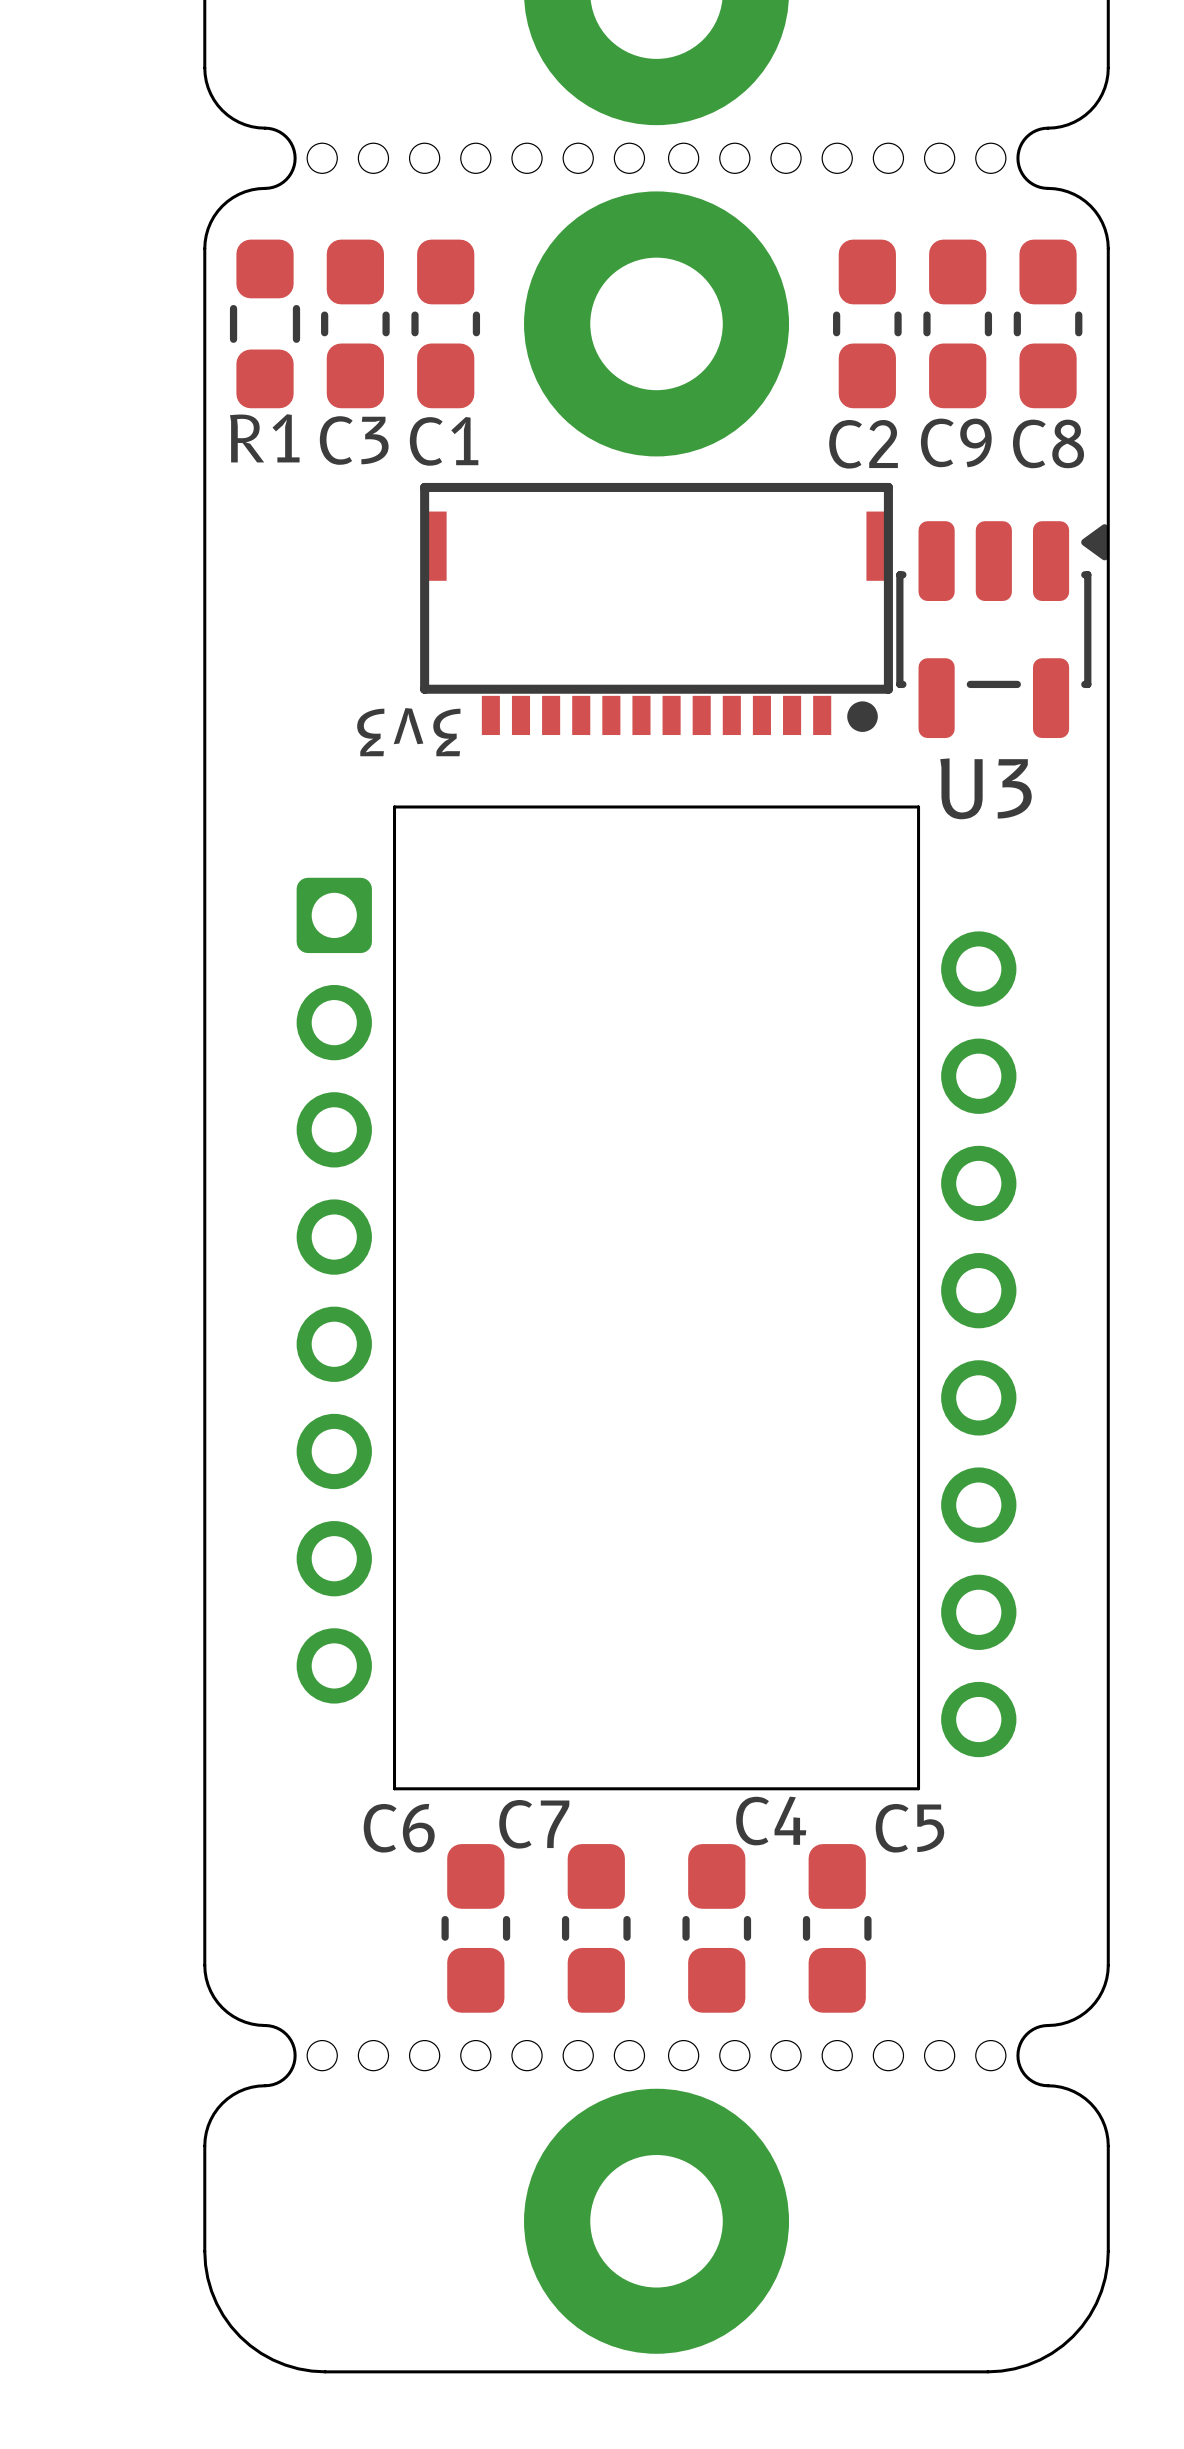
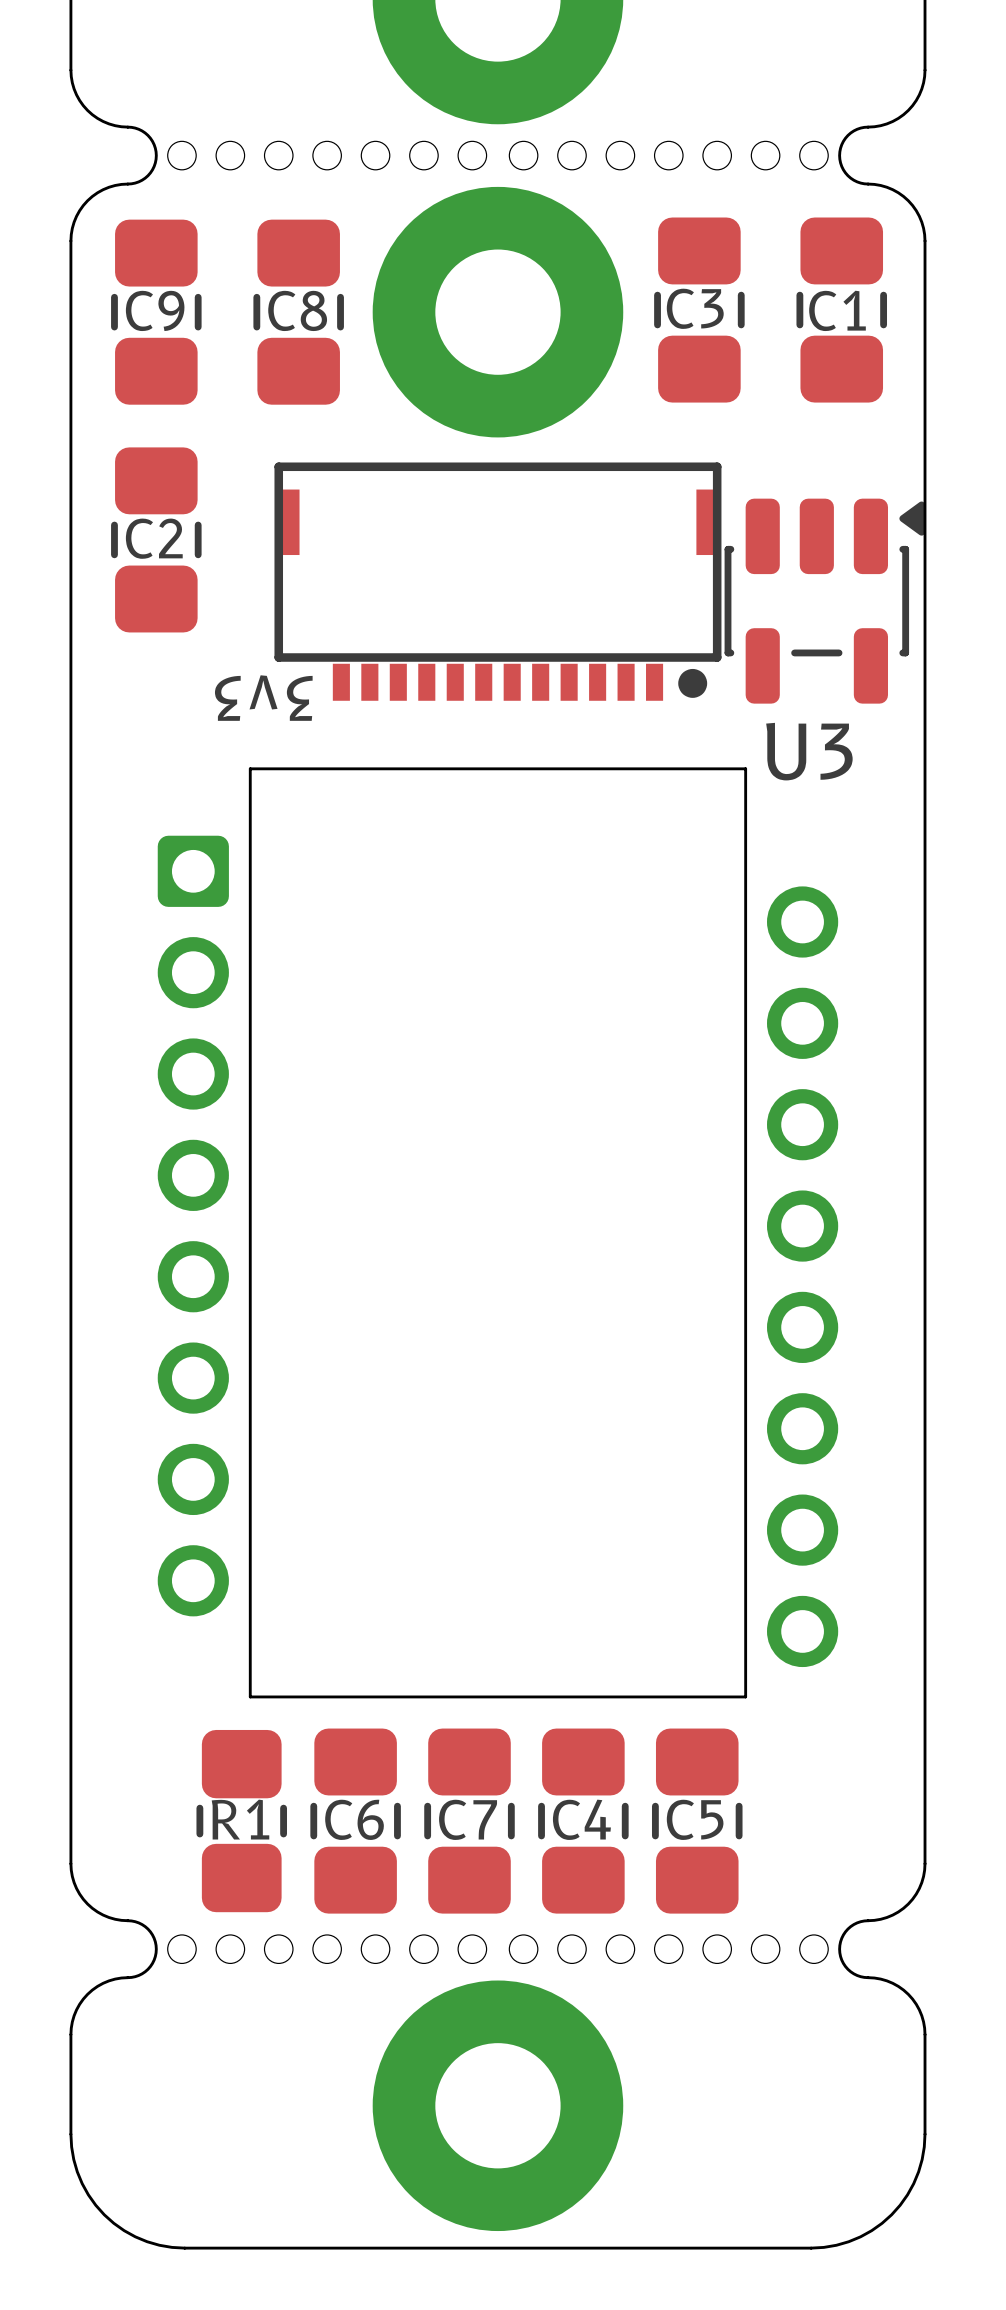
R1 footprint: [229, 239, 301, 409] -> [196, 1729, 288, 1913]
C3 footprint: [321, 239, 390, 409] -> [654, 217, 745, 403]
C1 footprint: [411, 239, 481, 409] -> [796, 217, 888, 403]
C2 footprint: [833, 239, 902, 409] -> [111, 447, 202, 633]
C9 footprint: [923, 239, 993, 409] -> [111, 219, 202, 405]
C8 footprint: [1013, 239, 1083, 409] -> [253, 219, 344, 405]
C9 name position: C9 (956, 442) -> C9 (155, 310)
C8 name position: C8 (1048, 443) -> C8 (297, 310)
C2 name position: C2 (863, 444) -> C2 (154, 538)
C4 name position: C4 (771, 1821) -> C4 (581, 1819)
C7 name position: C7 (534, 1824) -> C7 (468, 1819)
C6 name position: C6 (399, 1828) -> C6 (354, 1819)
C5 name position: C5 (909, 1828) -> C5 (695, 1819)
C6 footprint: [441, 1844, 511, 2013] -> [310, 1728, 401, 1914]
C7 footprint: [561, 1844, 631, 2013] -> [424, 1728, 515, 1914]
C4 footprint: [682, 1844, 752, 2013] -> [538, 1728, 629, 1914]
C5 footprint: [802, 1844, 872, 2013] -> [651, 1728, 743, 1914]

